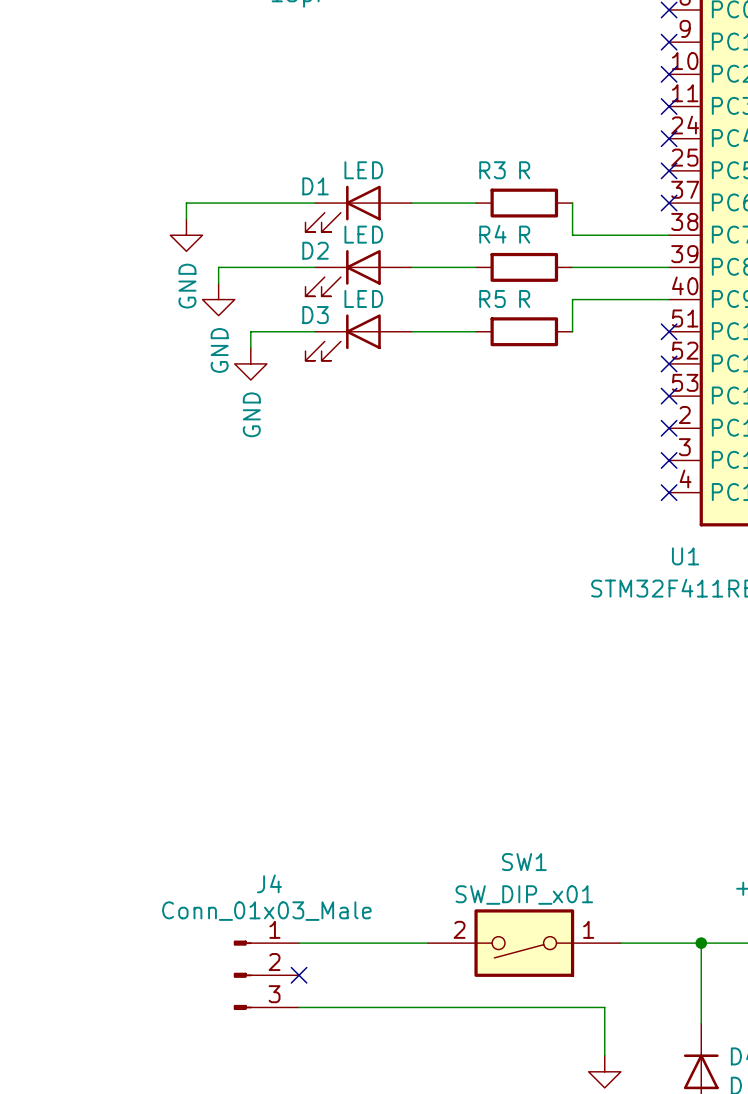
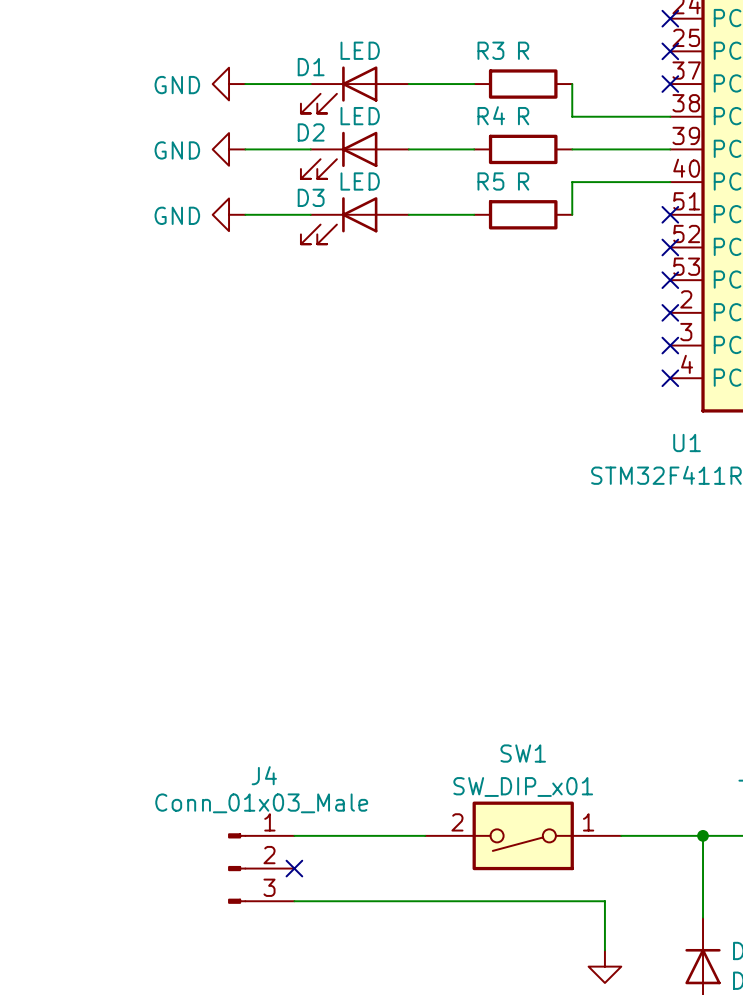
power symbol: none -> GND (229, 84)
wire: (250, 203) (186, 203) (186, 219) -> none
power symbol: GND (186, 235) -> none
power symbol: none -> GND (229, 149)
wire: (250, 267) (218, 267) (218, 283) -> none
power symbol: GND (218, 299) -> none
power symbol: none -> GND (229, 214)
wire: (250, 331) (250, 347) -> none
power symbol: GND (250, 363) -> none

